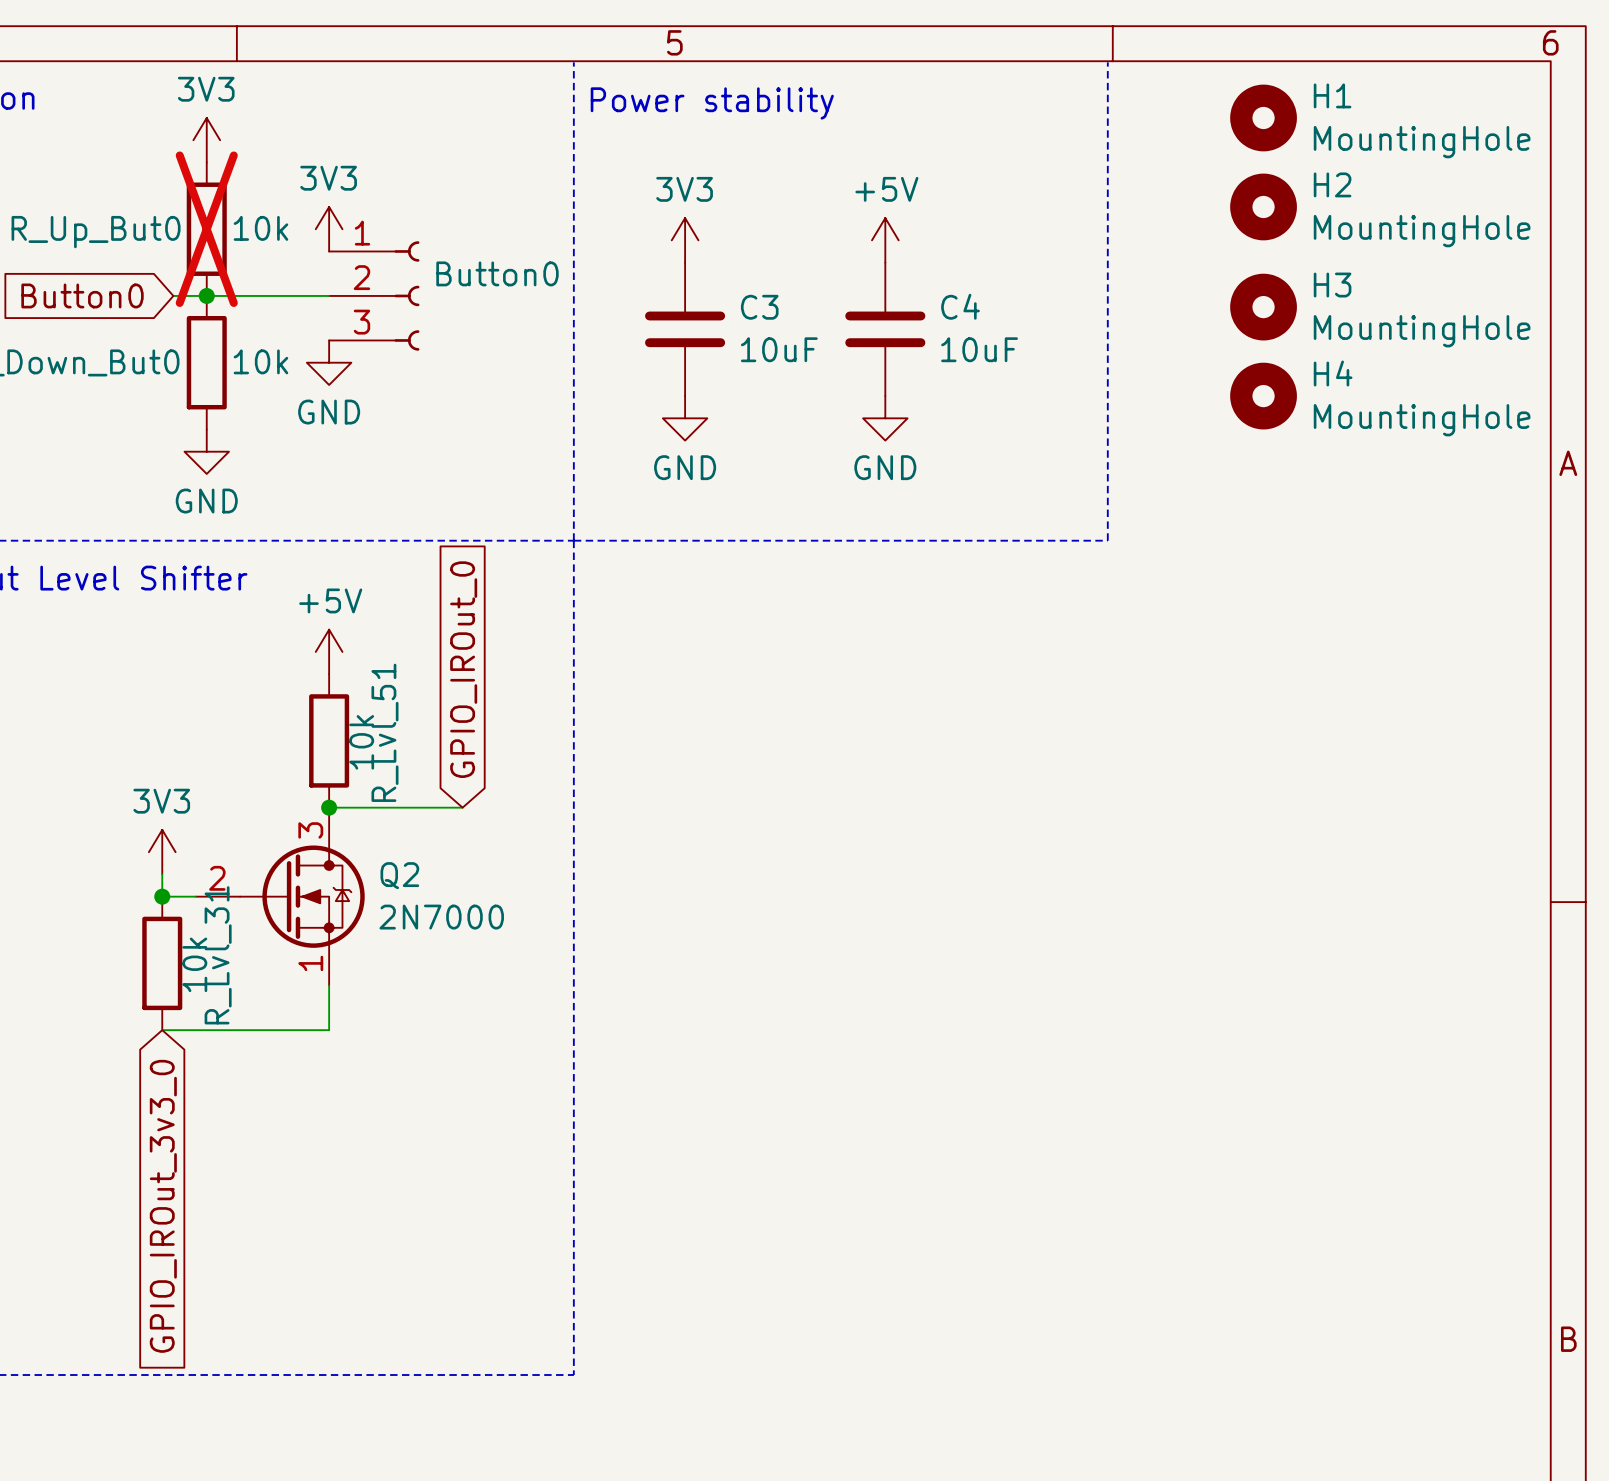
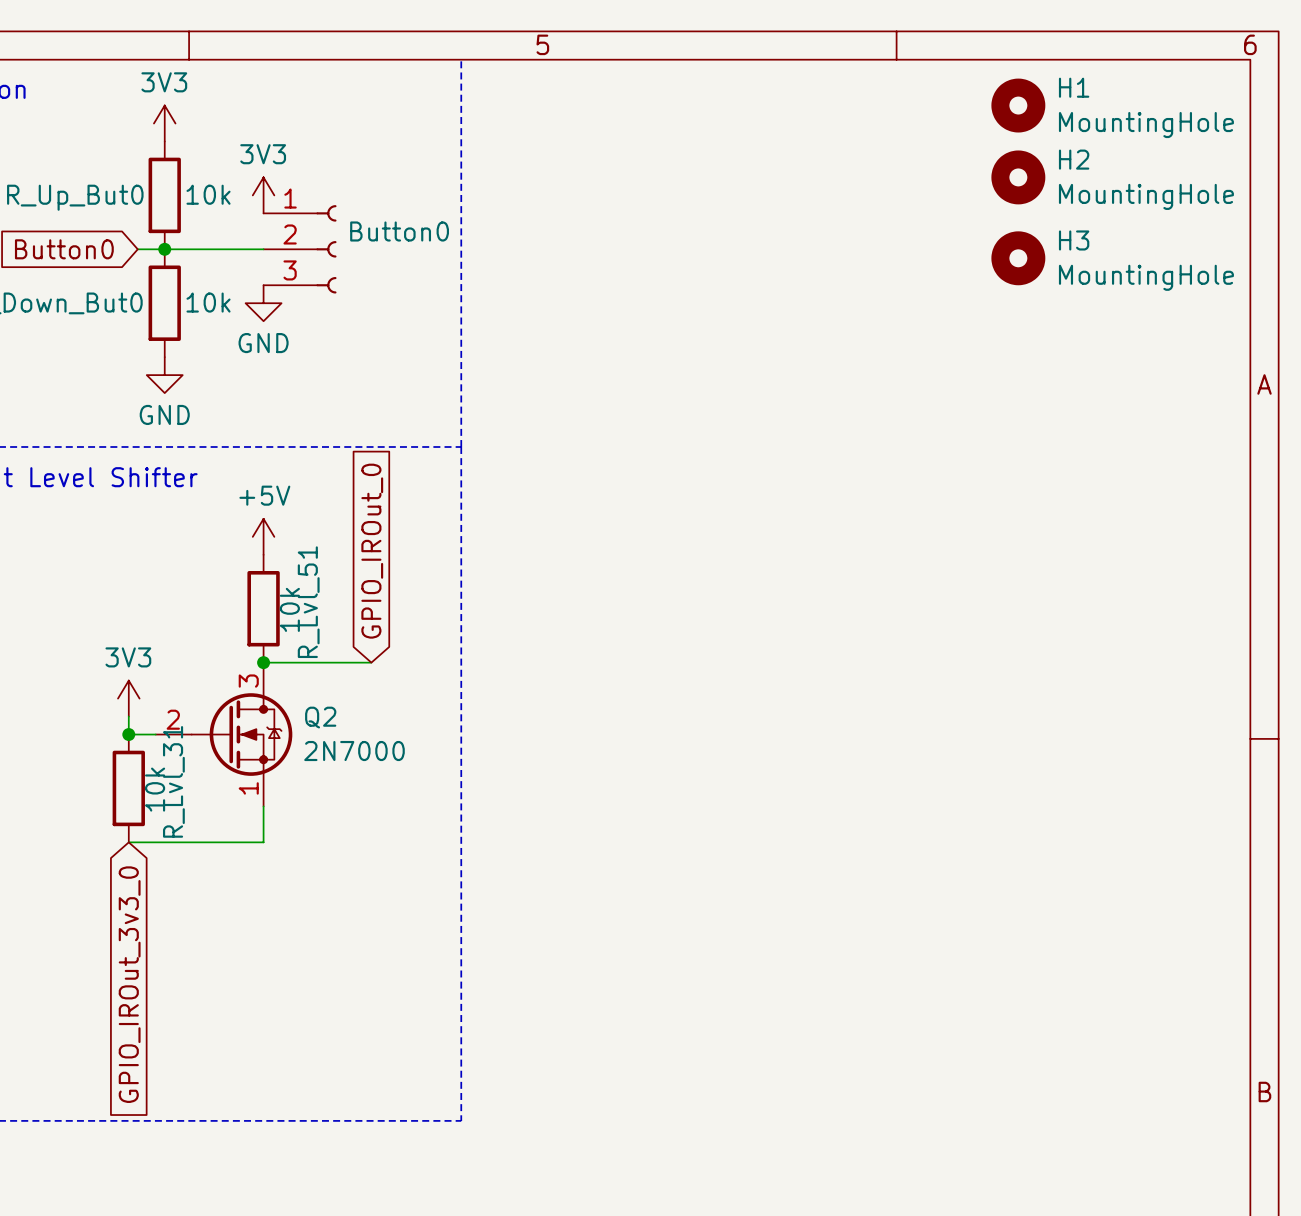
line: (1107, 62) (1107, 540) (573, 540) -> none
text: Power stability (712, 103) -> none
R_Up_But0 do-not-place cross: (206, 229) -> none
power symbol: 3V3 (685, 240) -> none
power symbol: +5V (885, 240) -> none
C3: 10uF (685, 329) -> none
C4: 10uF (885, 329) -> none
H4: MountingHole (1263, 396) -> none
power symbol: GND (685, 418) -> none
power symbol: GND (885, 418) -> none

